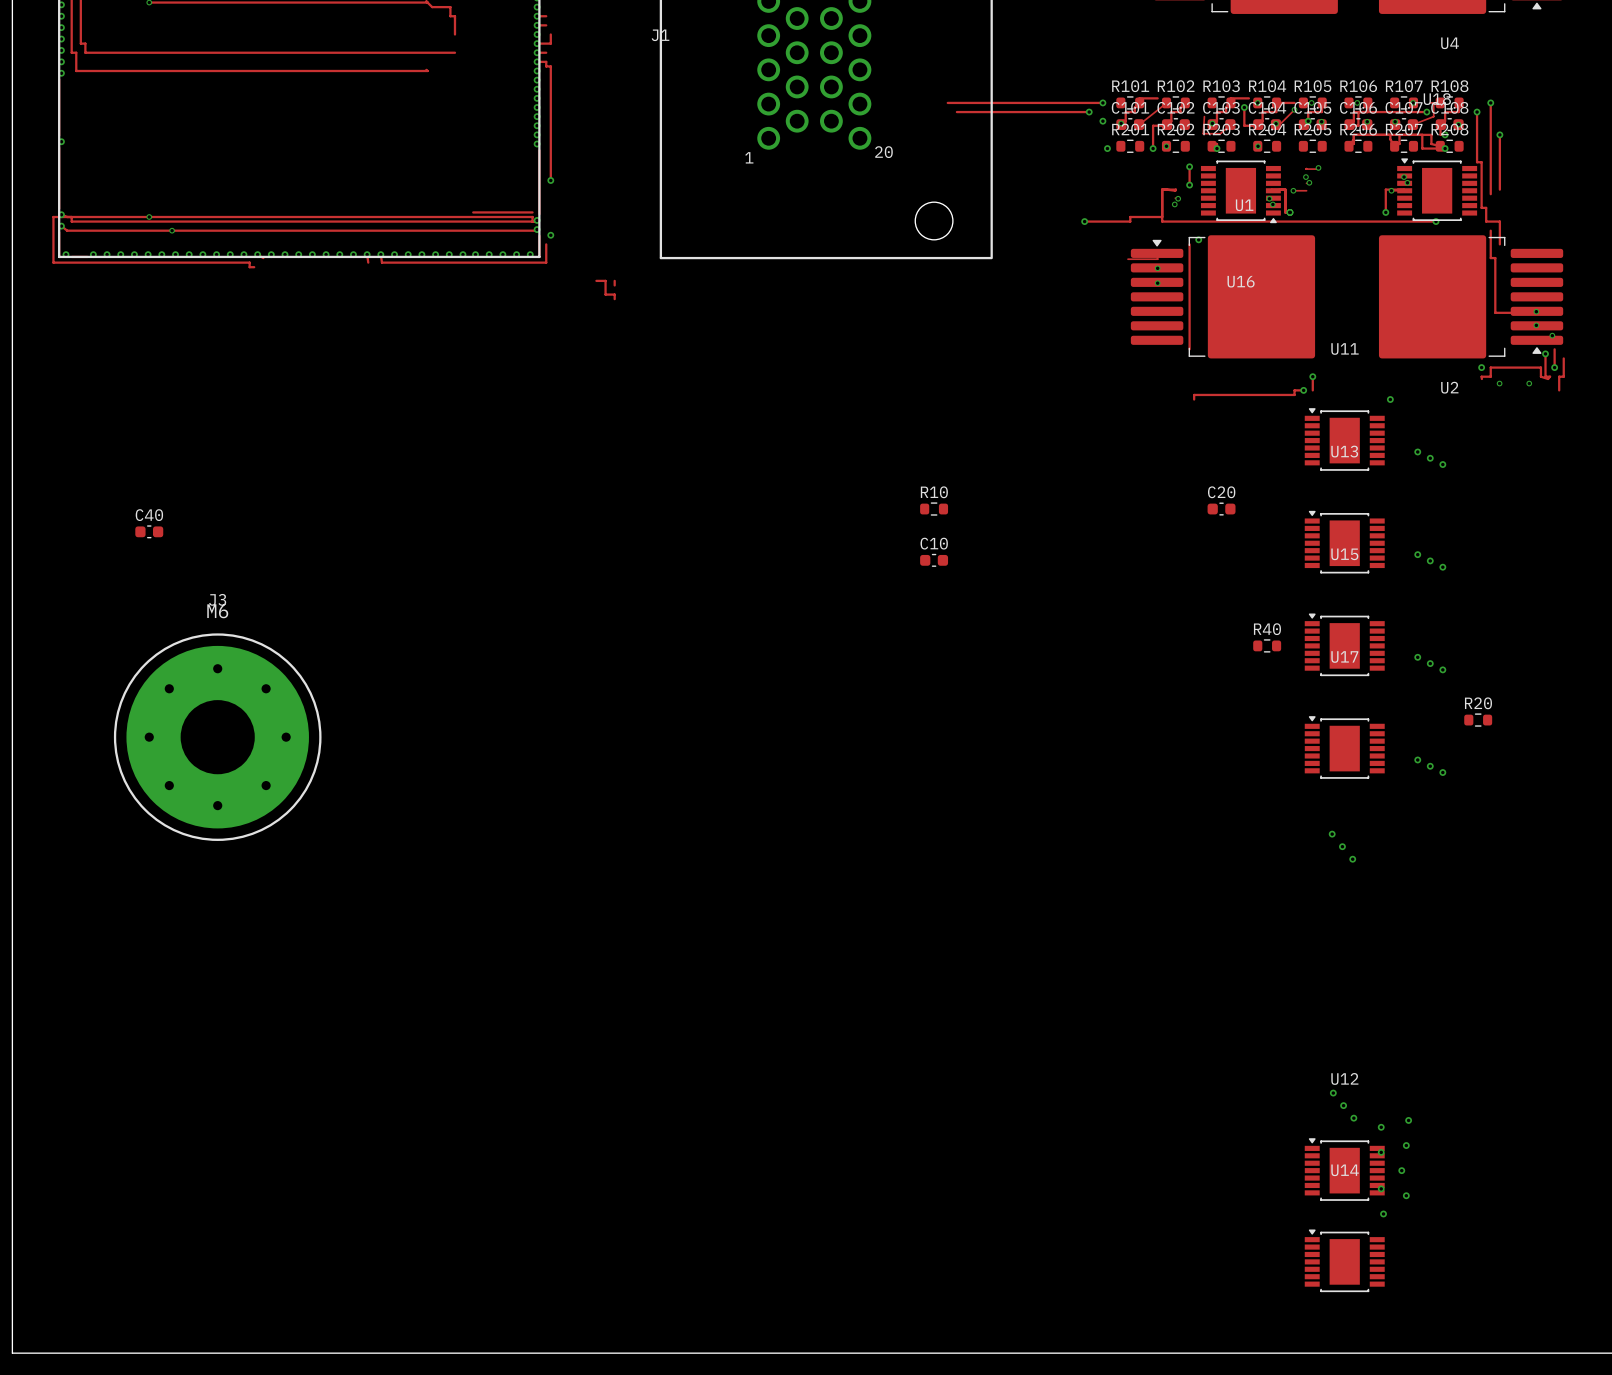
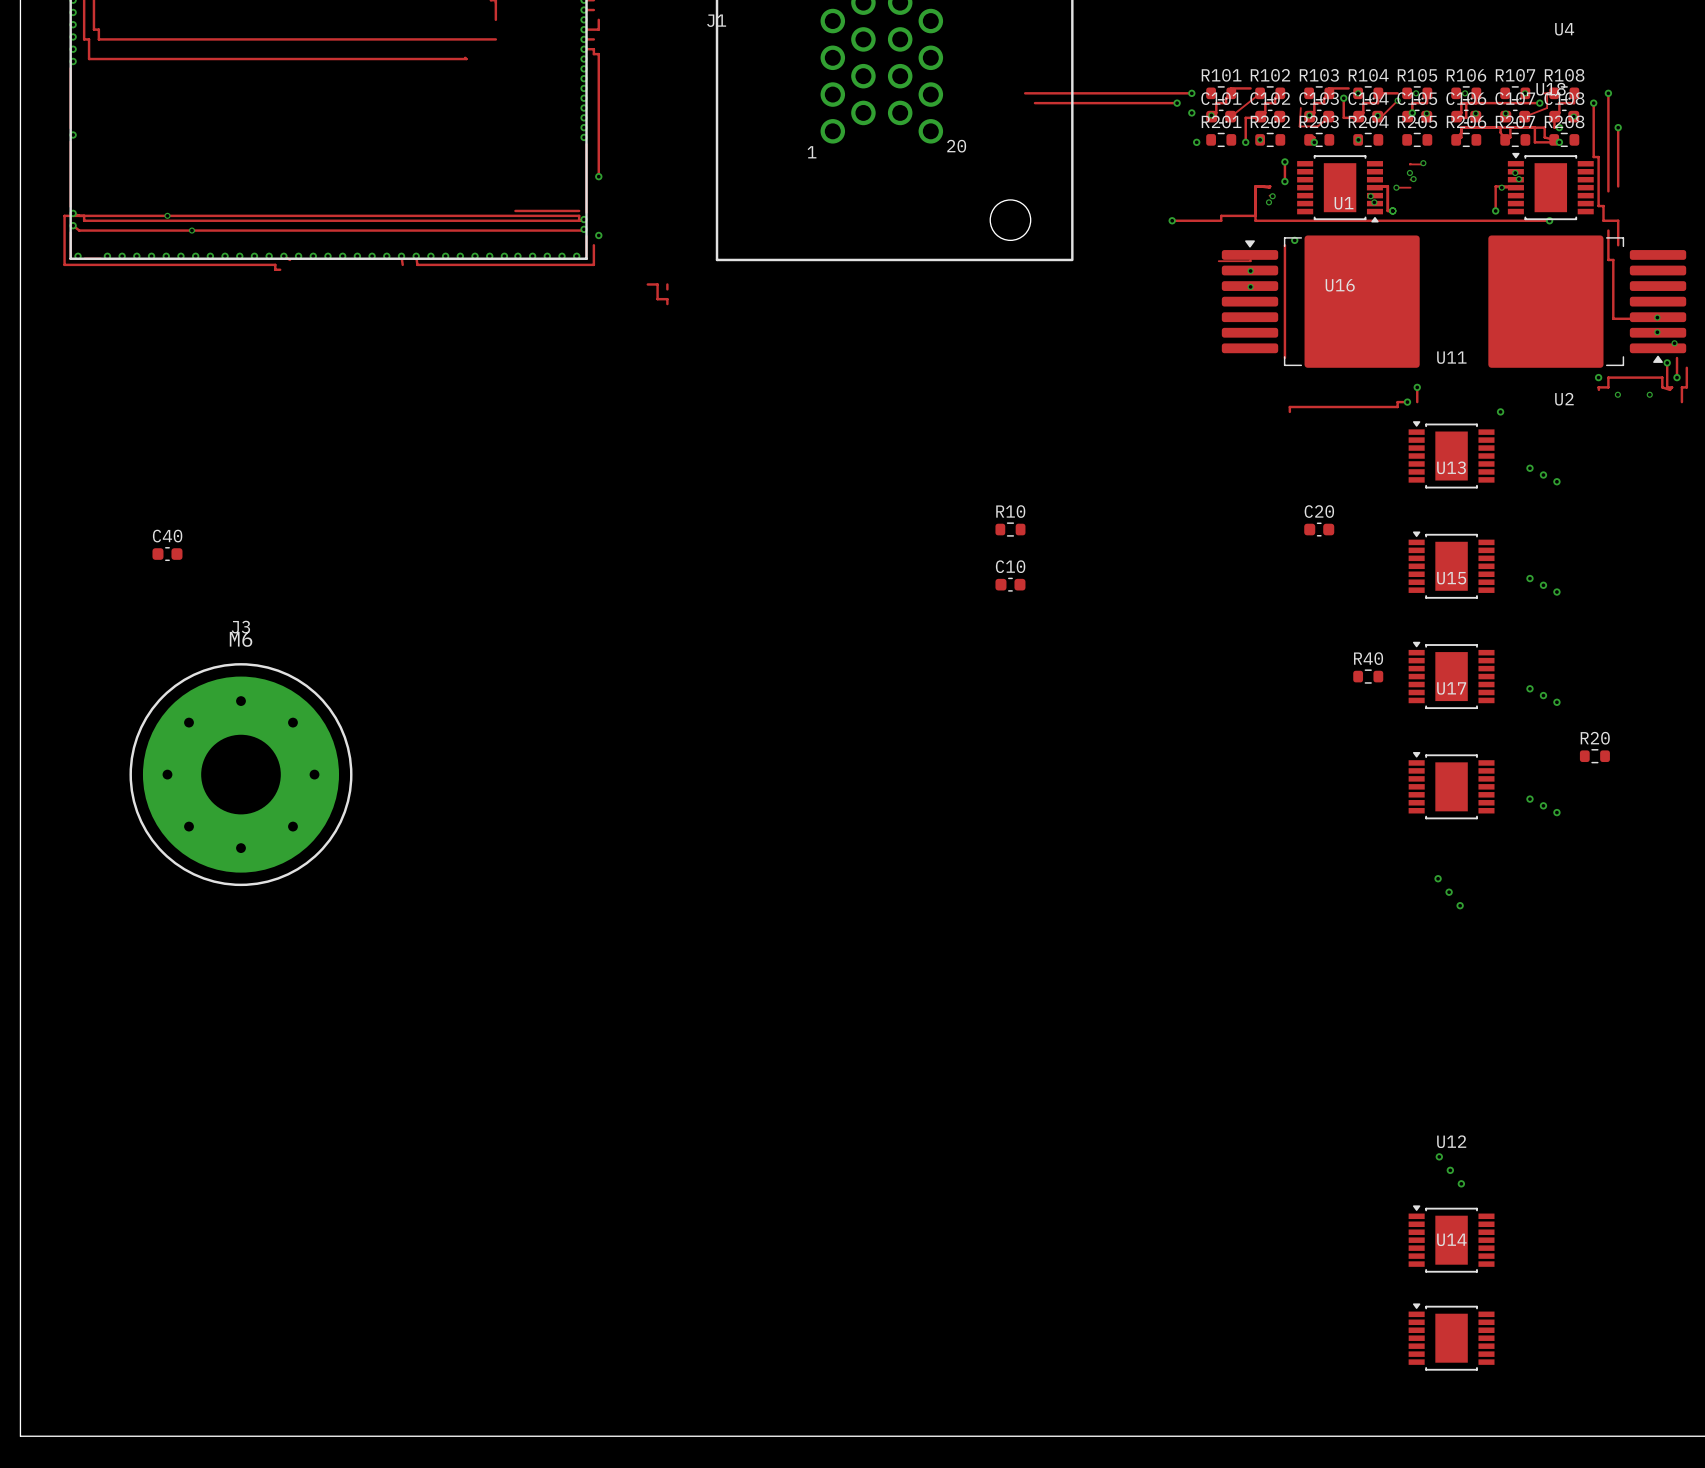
via: (1408, 1120) -> none
via: (1381, 1127) -> none
via: (1406, 1145) -> none
via: (1381, 1152) -> none
via: (1401, 1170) -> none
via: (1381, 1188) -> none
via: (1406, 1195) -> none
via: (1383, 1213) -> none

